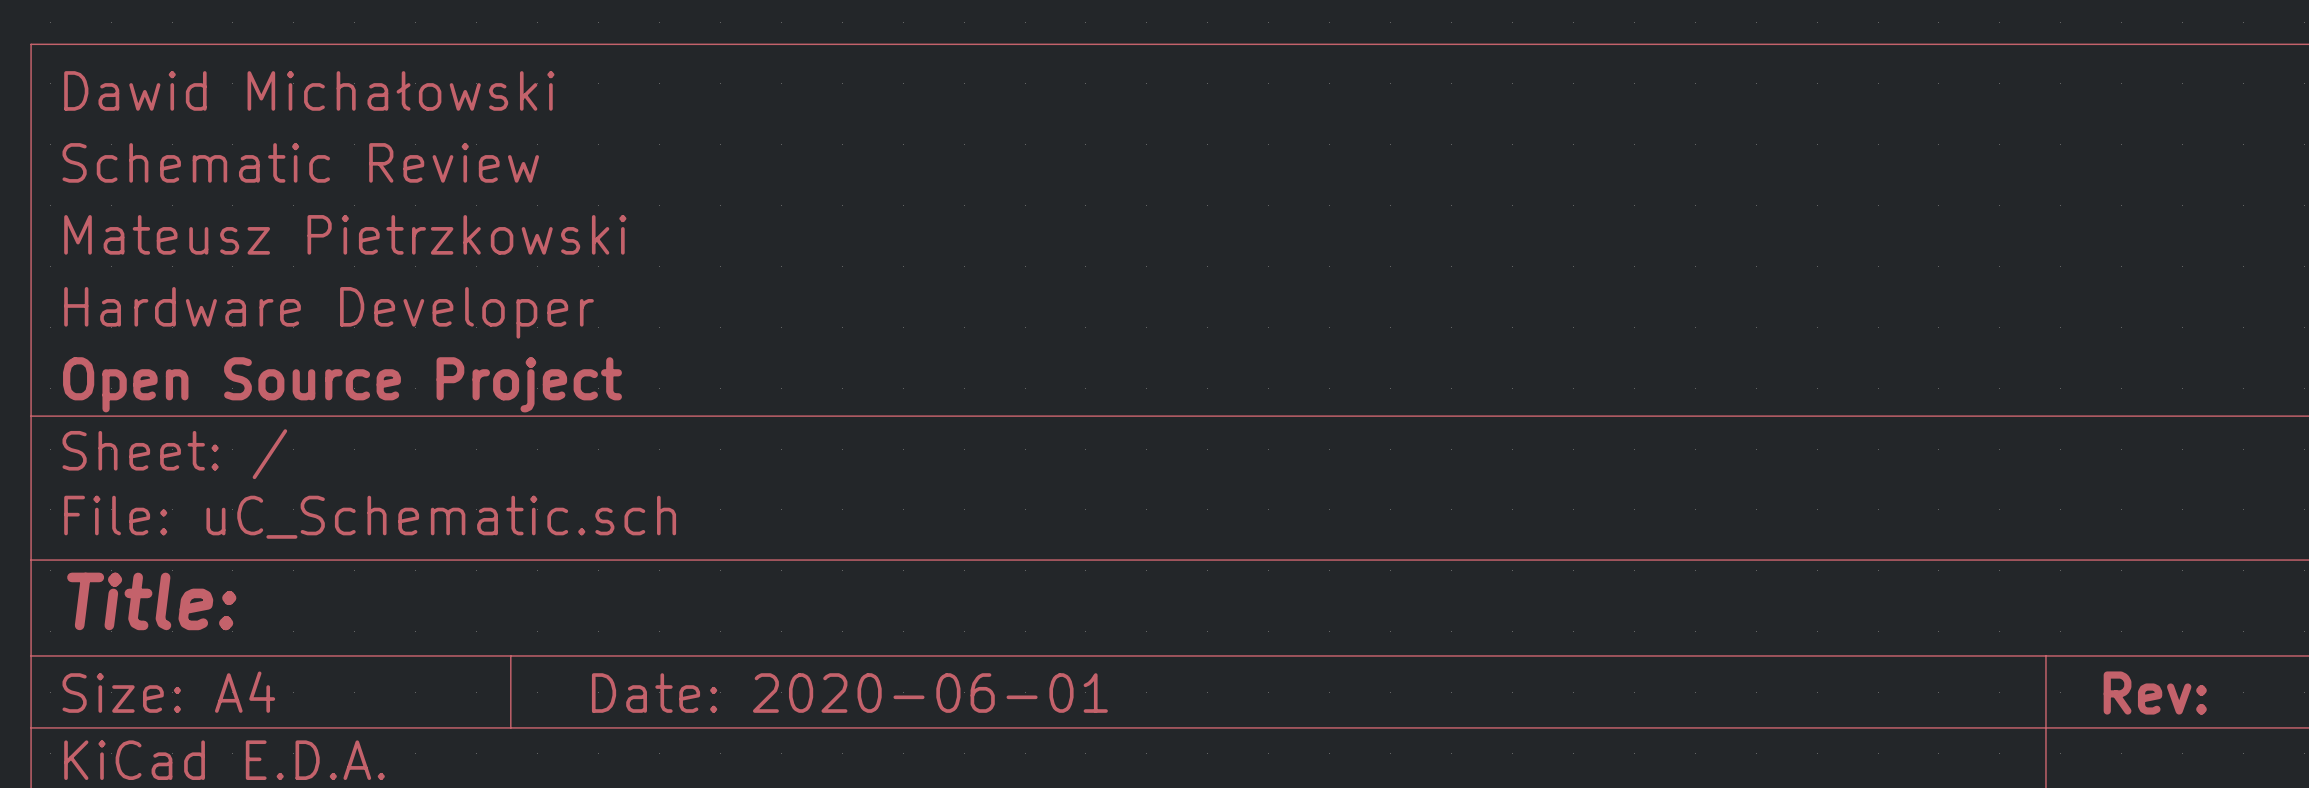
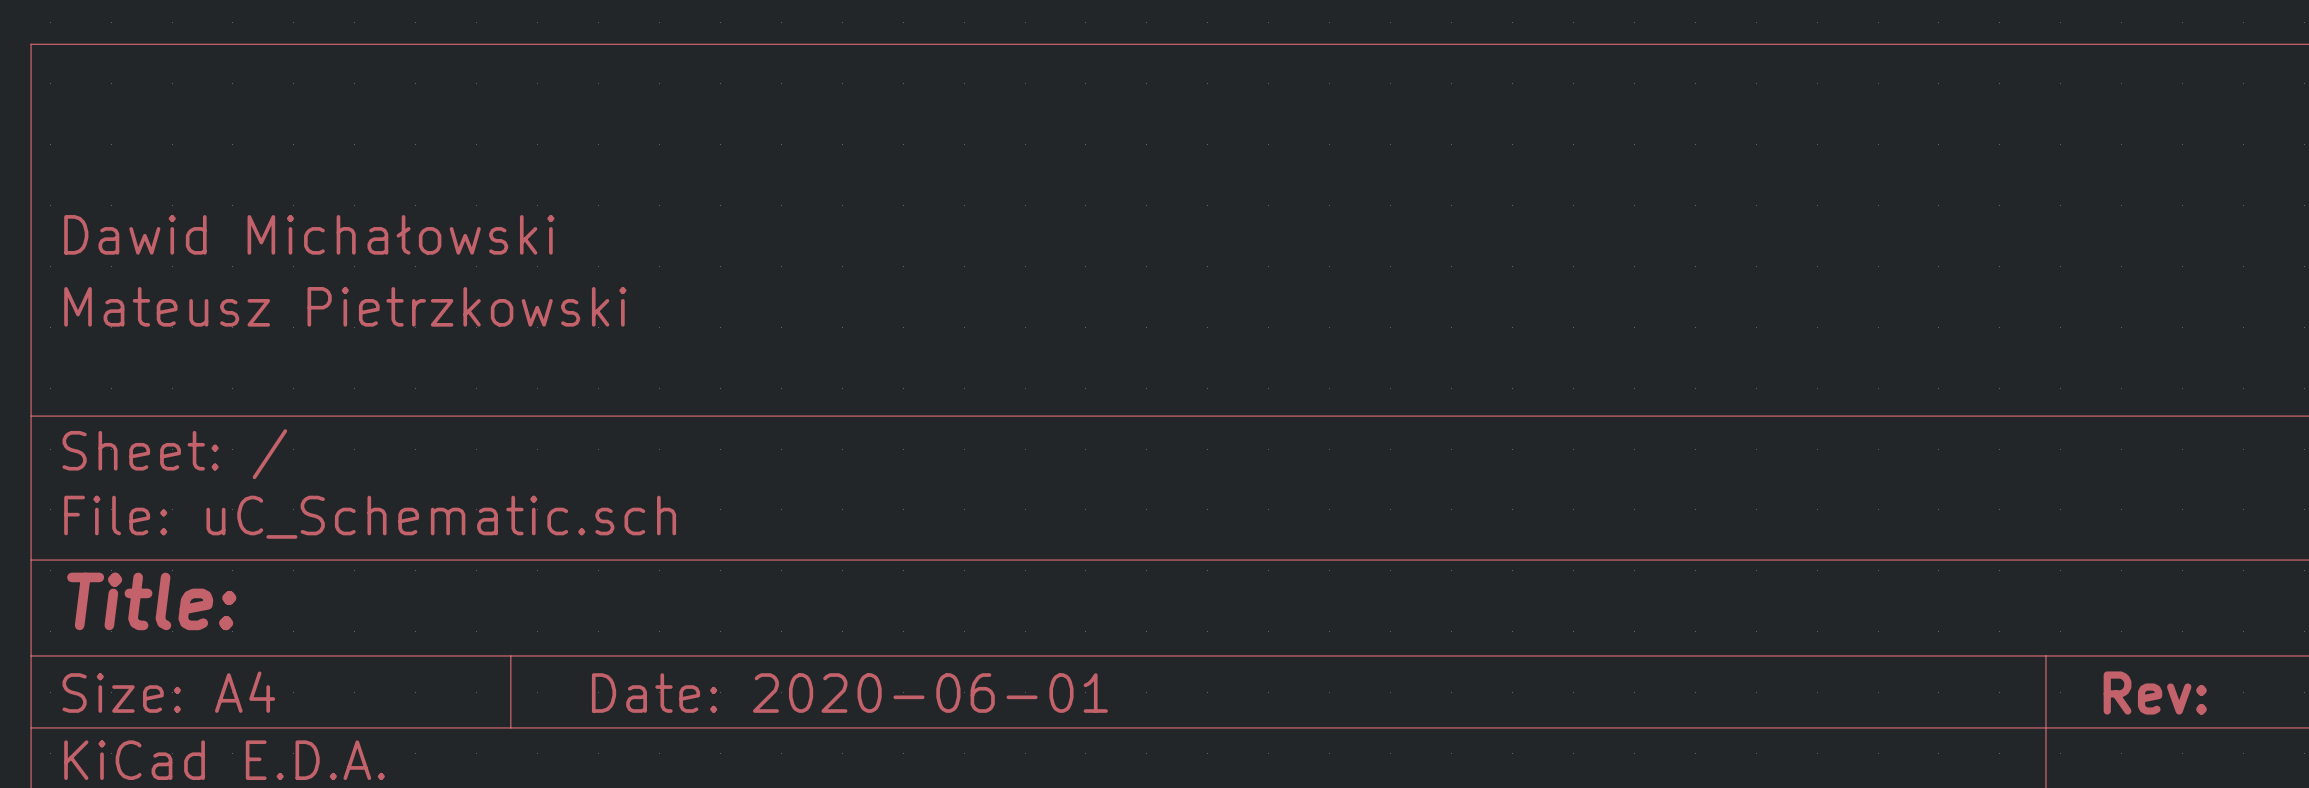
title block: Dawid Michałowski (309, 90) -> none
title block: Schematic Review (300, 162) -> none
title block: Mateusz Pietrzkowski (345, 234) -> Dawid Michałowski (309, 234)
title block: Hardware Developer (329, 312) -> Mateusz Pietrzkowski (345, 306)
title block: Open Source Project (342, 384) -> none

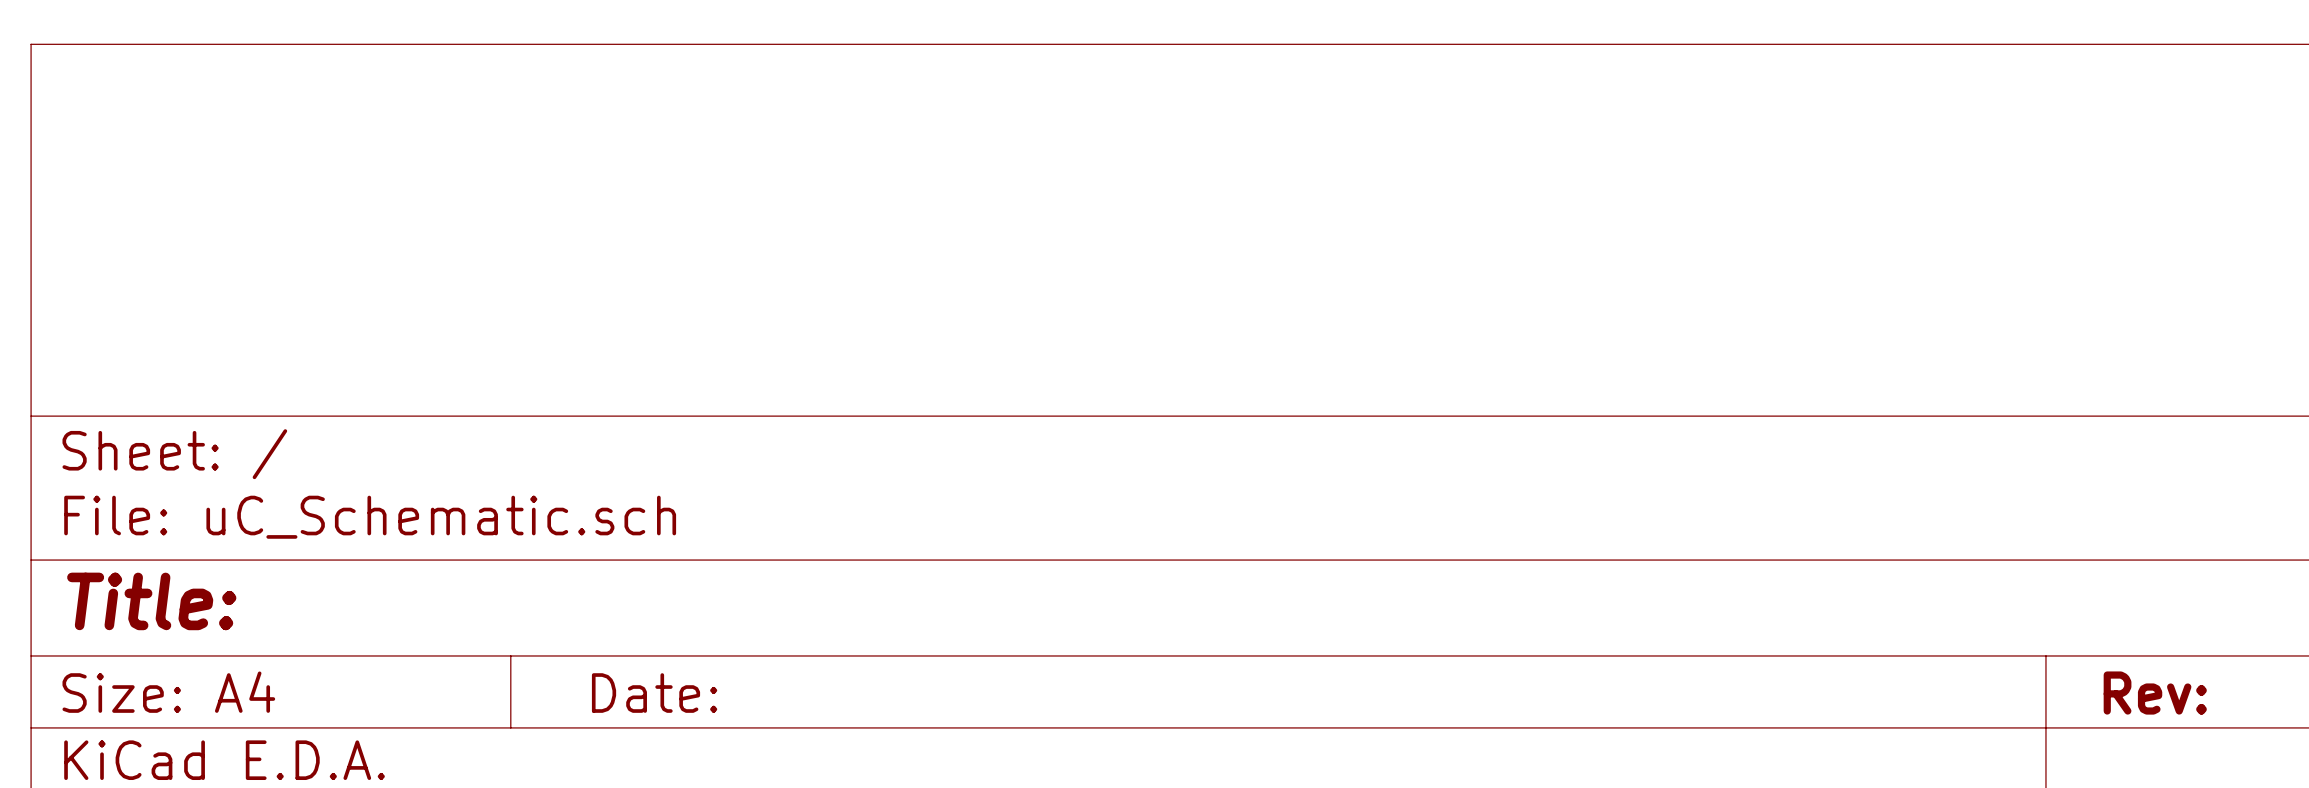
title block: Dawid Michałowski (309, 234) -> none
title block: Mateusz Pietrzkowski (345, 306) -> none
title block: Date: 2020-06-01 (849, 693) -> Date: (654, 693)

